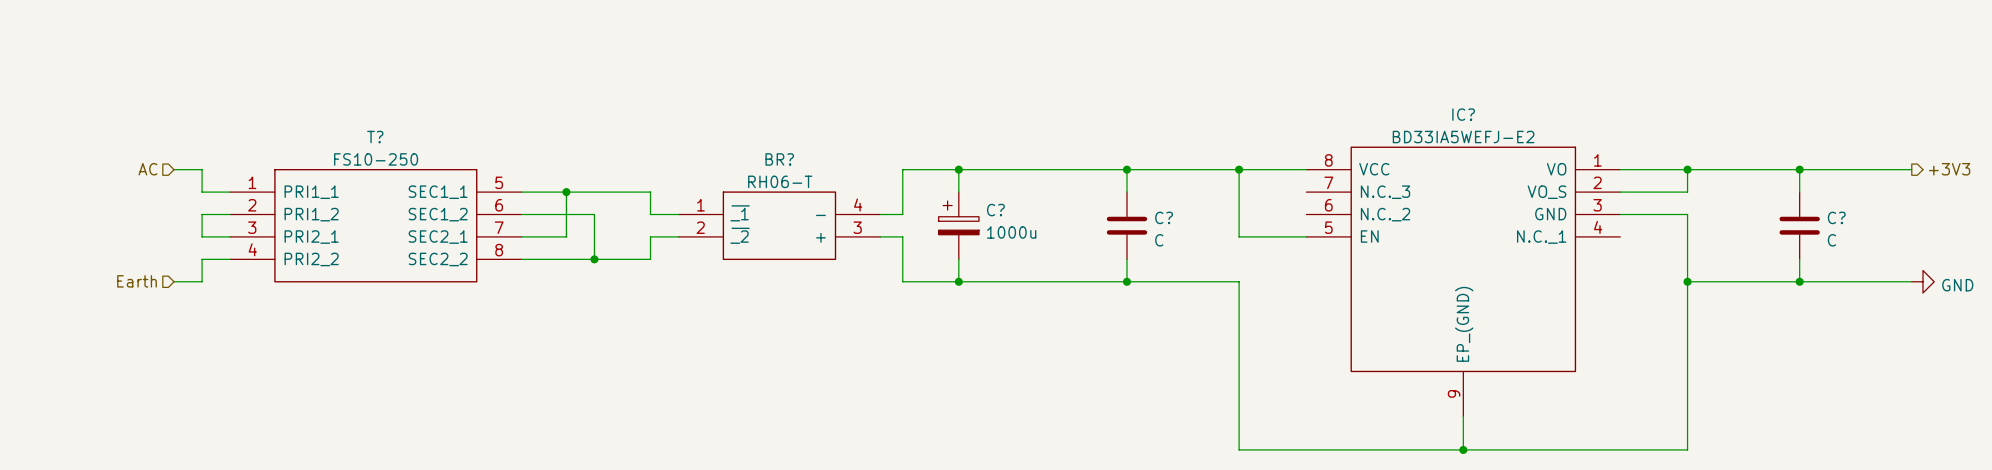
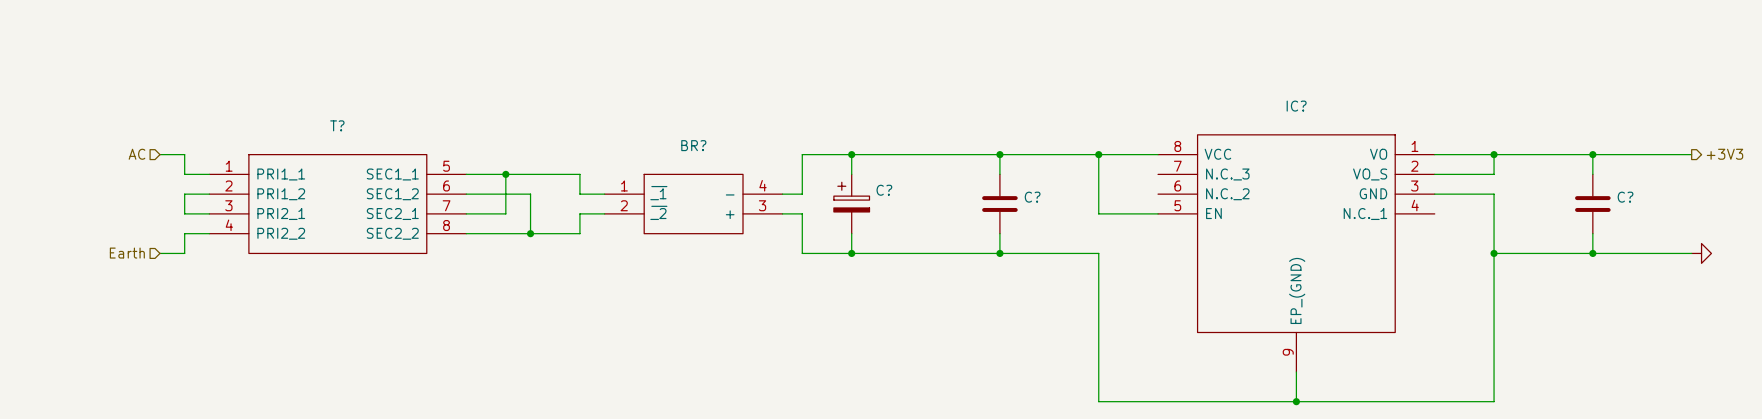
IC? value: BD33IA5WEFJ-E2 (1463, 137) -> none
T? value: FS10-250 (376, 159) -> none
BR? value: RH06-T (780, 181) -> none
C? value: 1000u (1011, 232) -> none
C? value: C (1159, 240) -> none
C? value: C (1831, 240) -> none
power symbol text: GND (1957, 285) -> none

